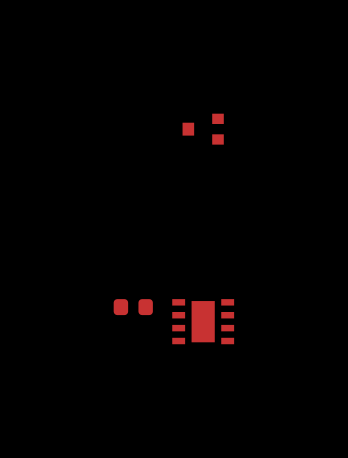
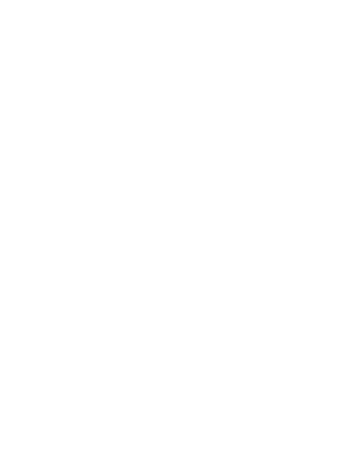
part: (203, 129) -> none
part: (133, 307) -> none
part: (203, 321) -> none

